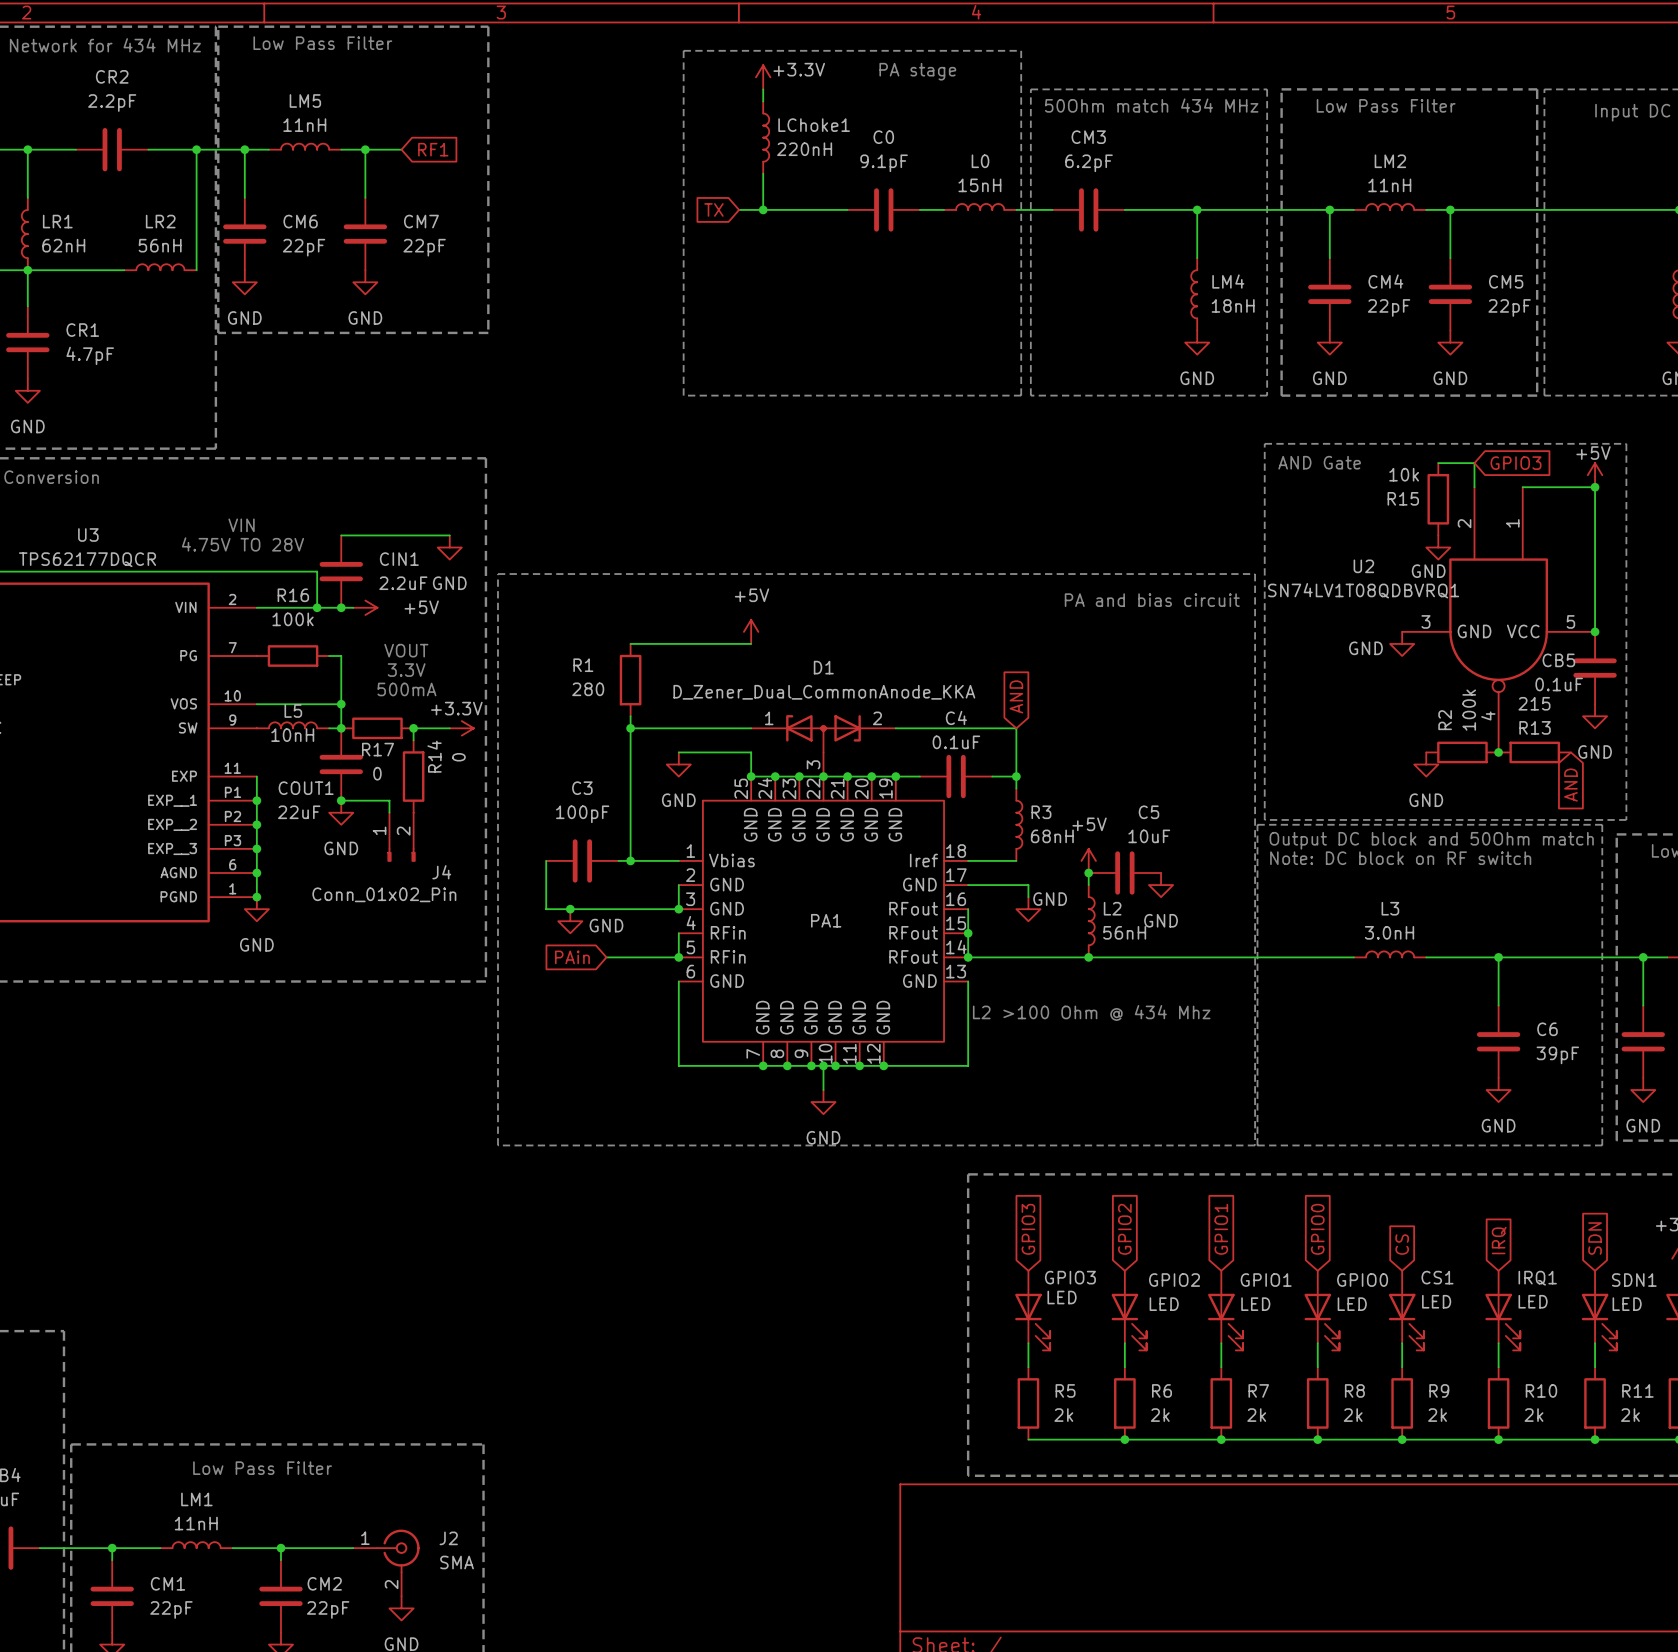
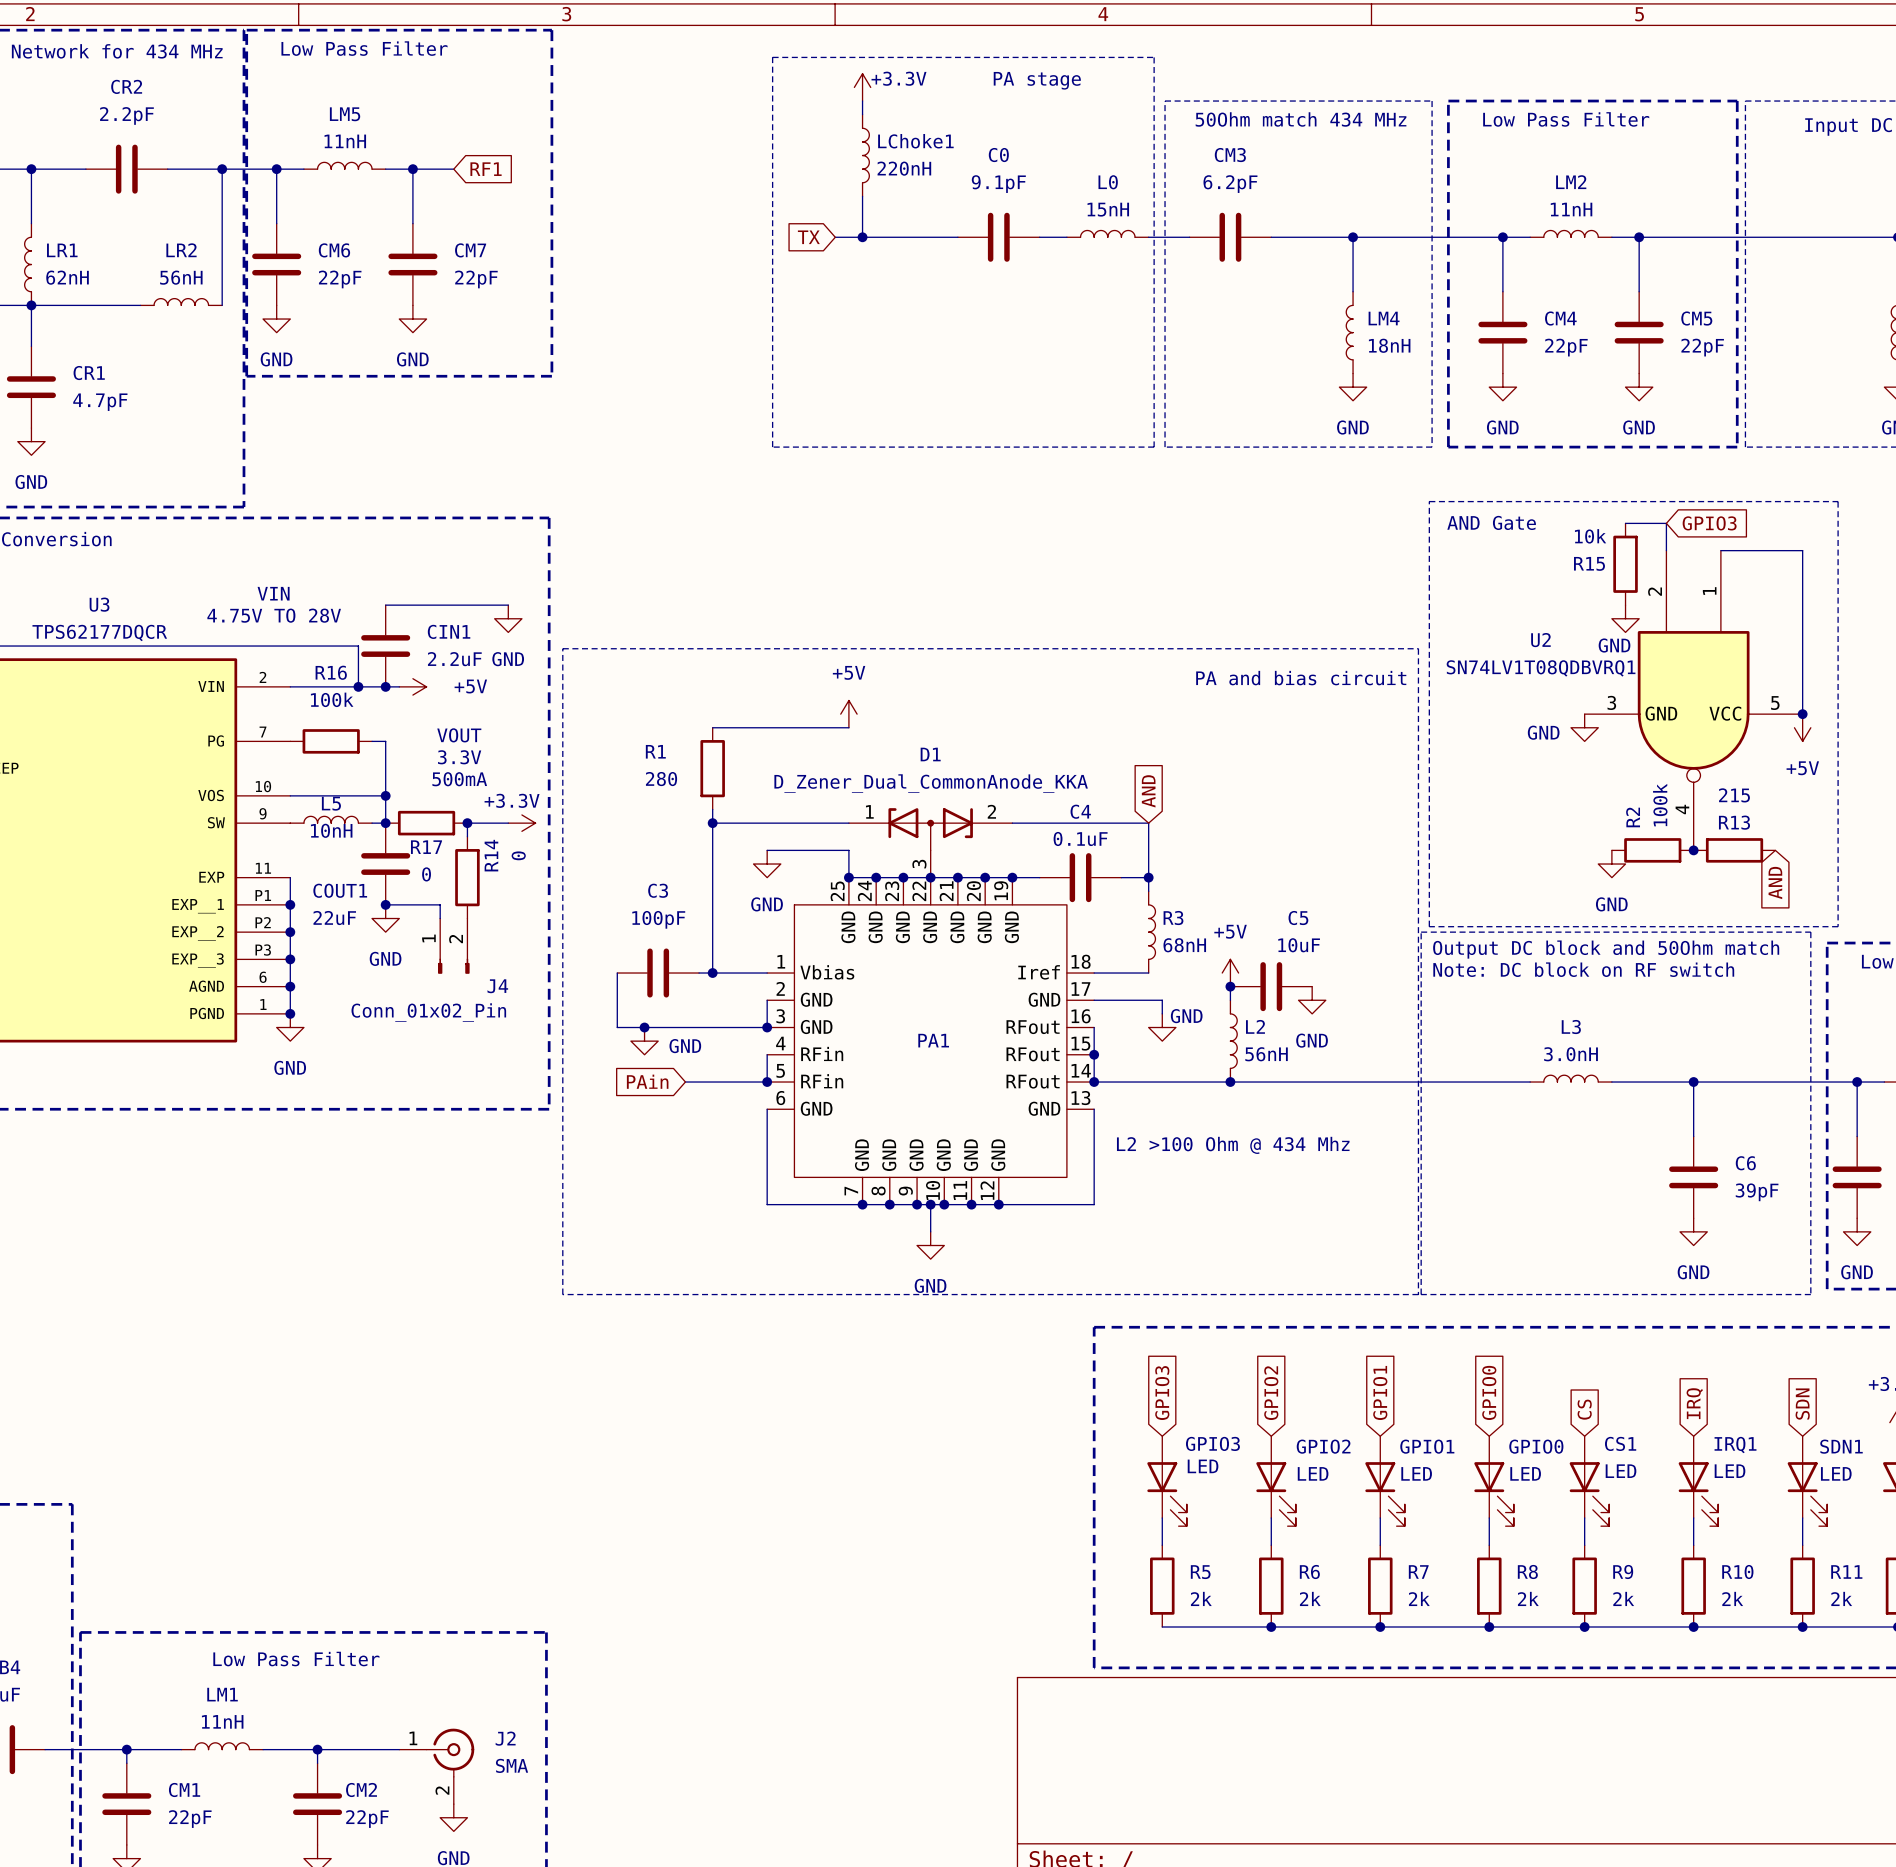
power symbol rotation: 0° (1595, 475) -> 180° (1802, 727)
power symbol position: +5V (1595, 475) -> +5V (1802, 727)
junction: (1595, 487) -> none
CB5: 0.1uF (1595, 668) -> none
power symbol: GND (1595, 716) -> none

